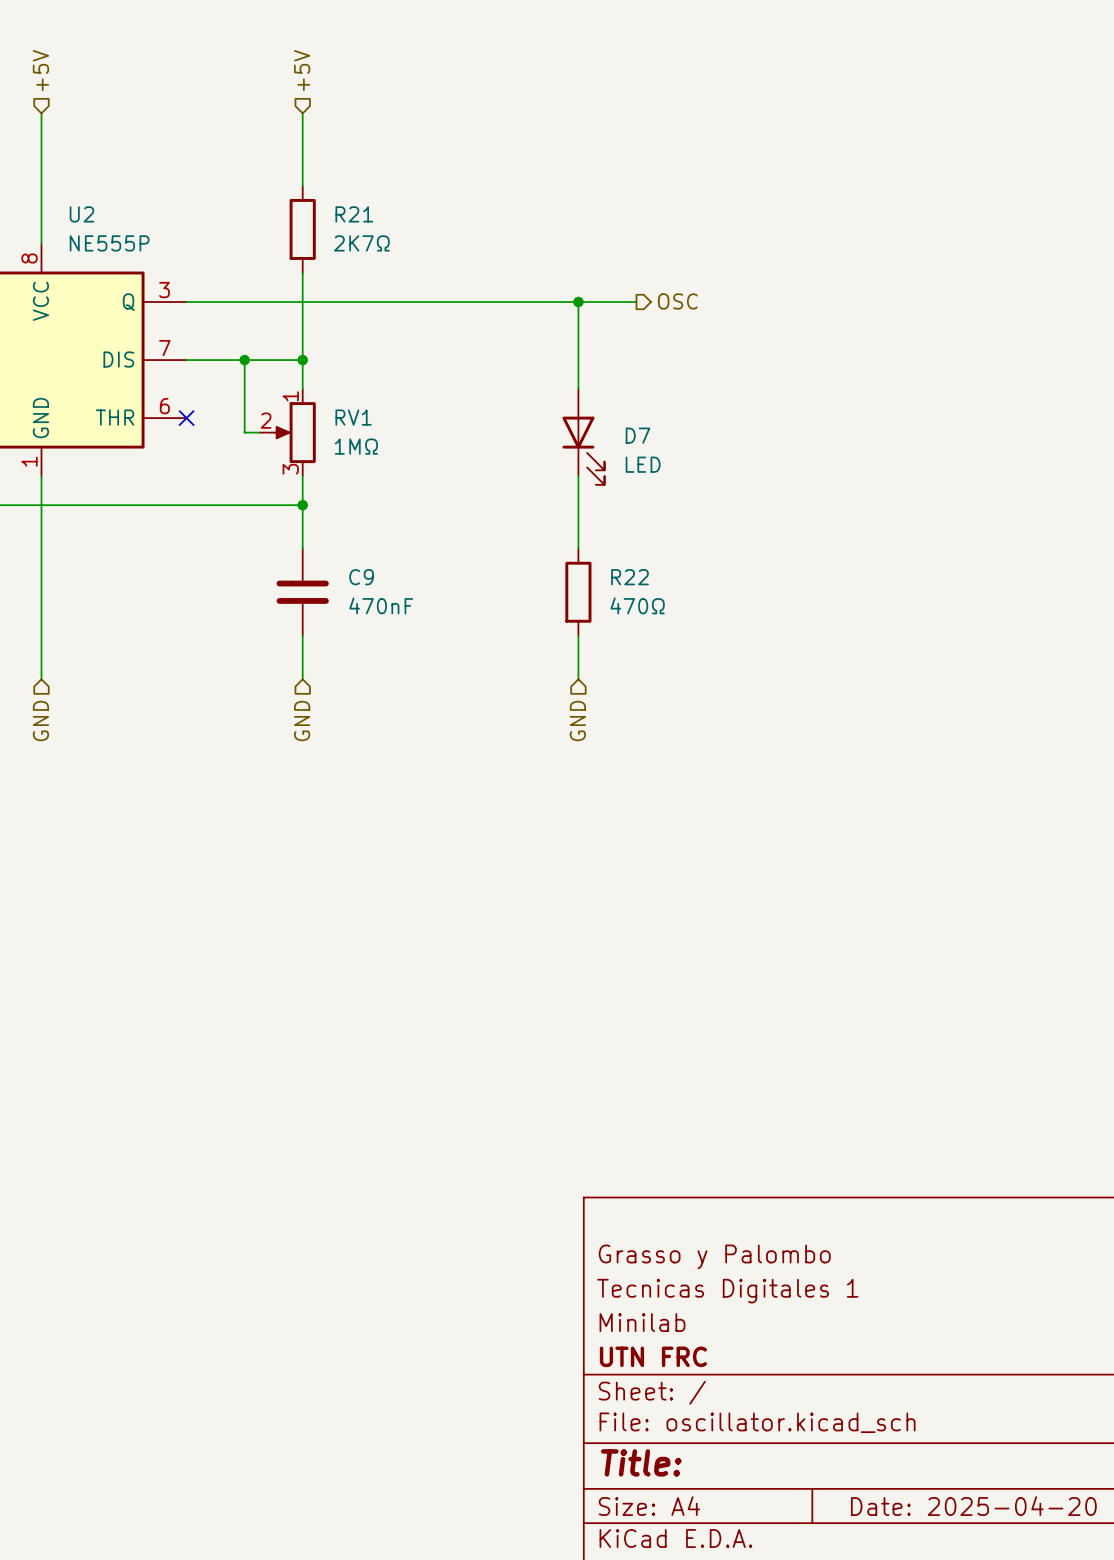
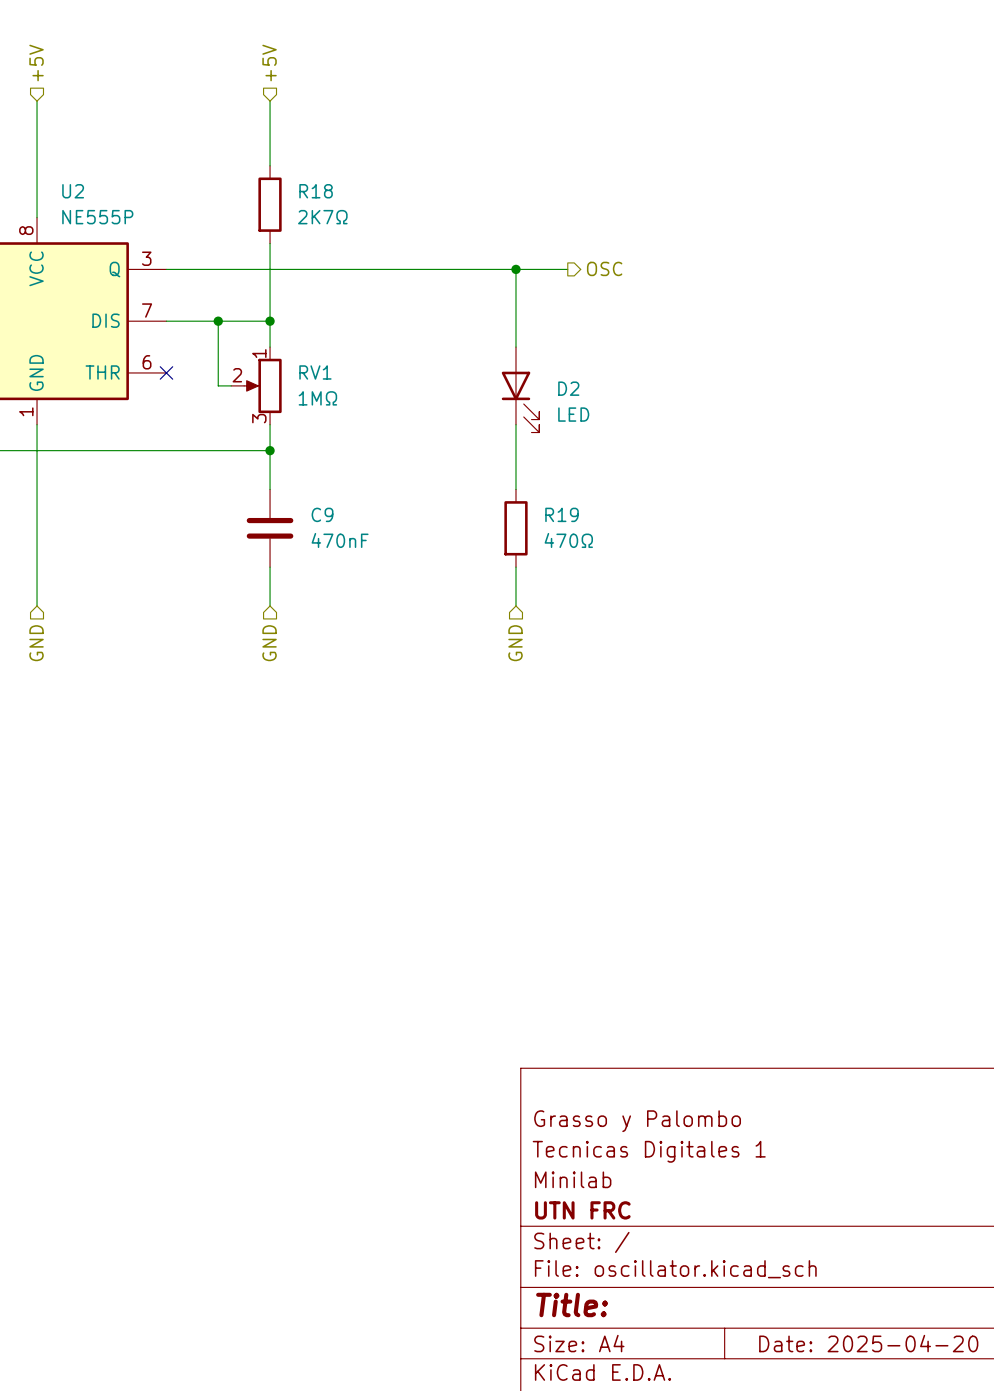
R21 name: R21 (354, 214) -> R18 (316, 191)
D7 name: D7 (637, 435) -> D2 (568, 388)
R22 name: R22 (630, 577) -> R19 (562, 514)

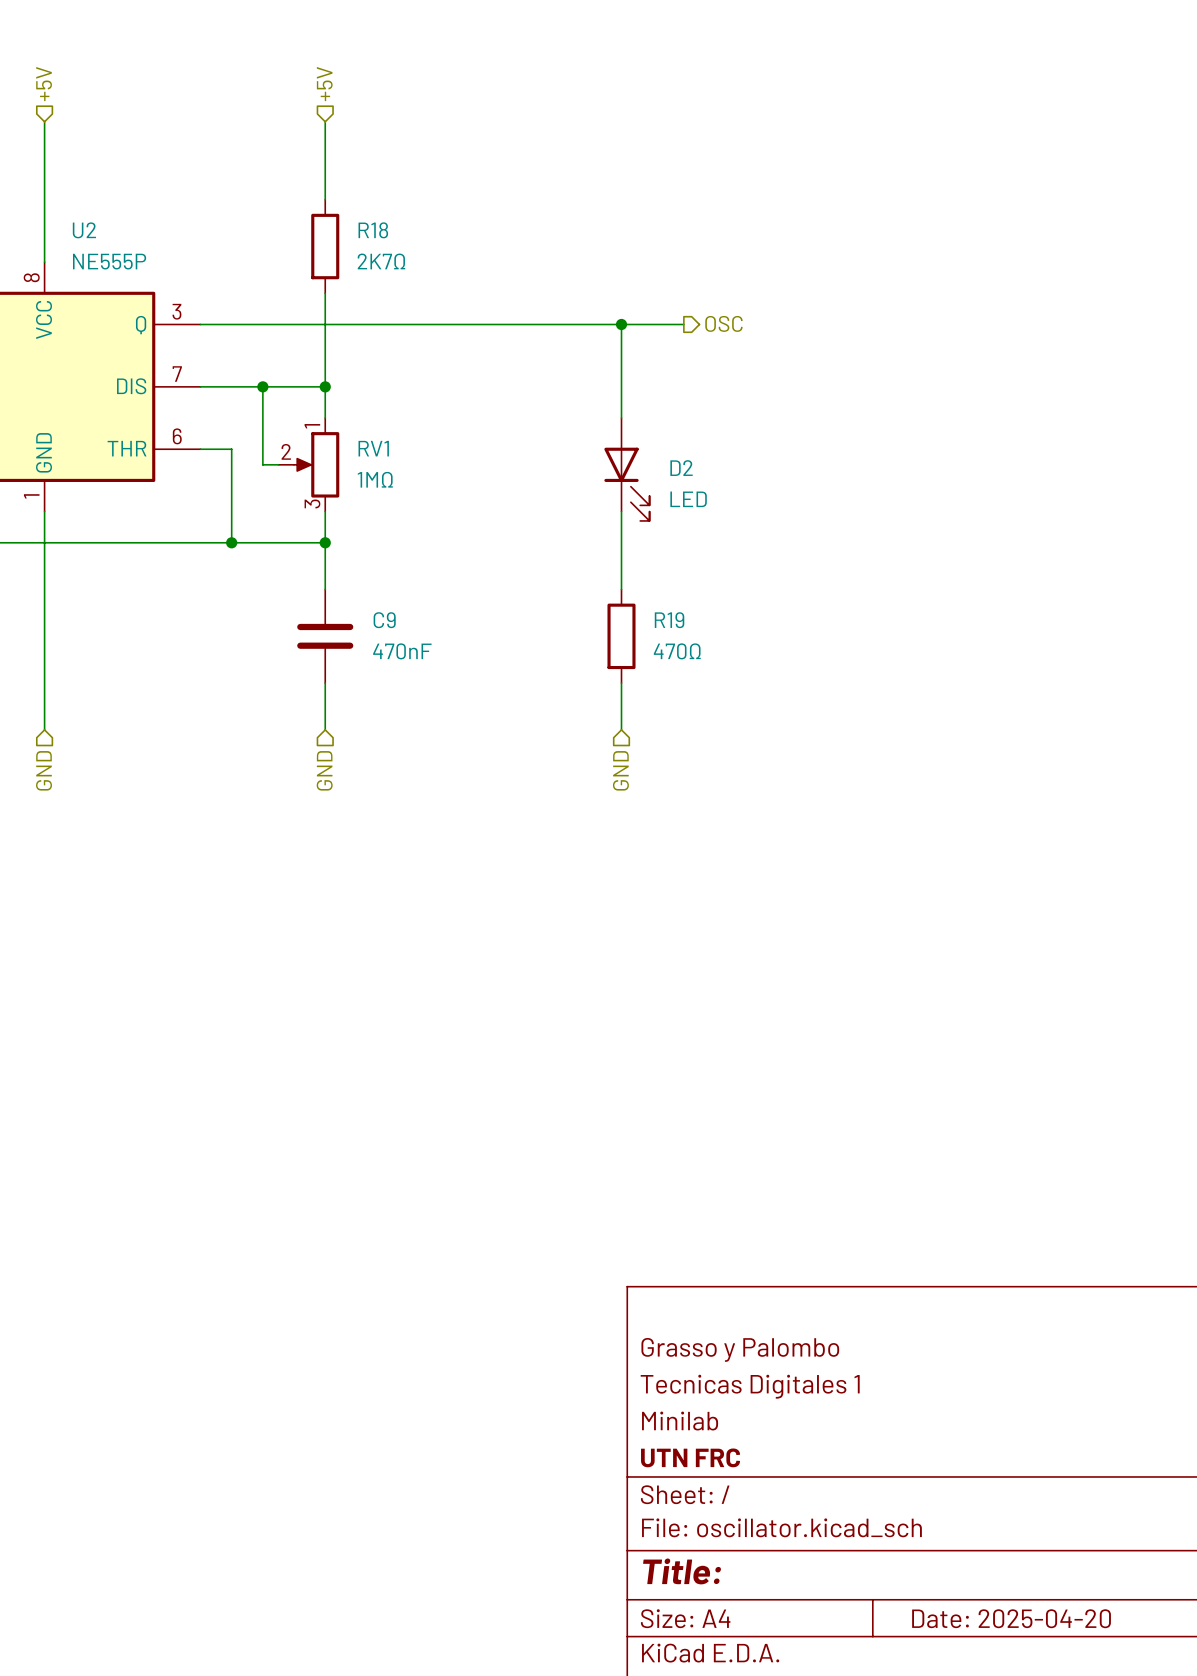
wire: none -> (200, 449) (231, 449) (231, 542)
no-connect mark: (166, 372) -> none
junction: none -> (231, 542)

